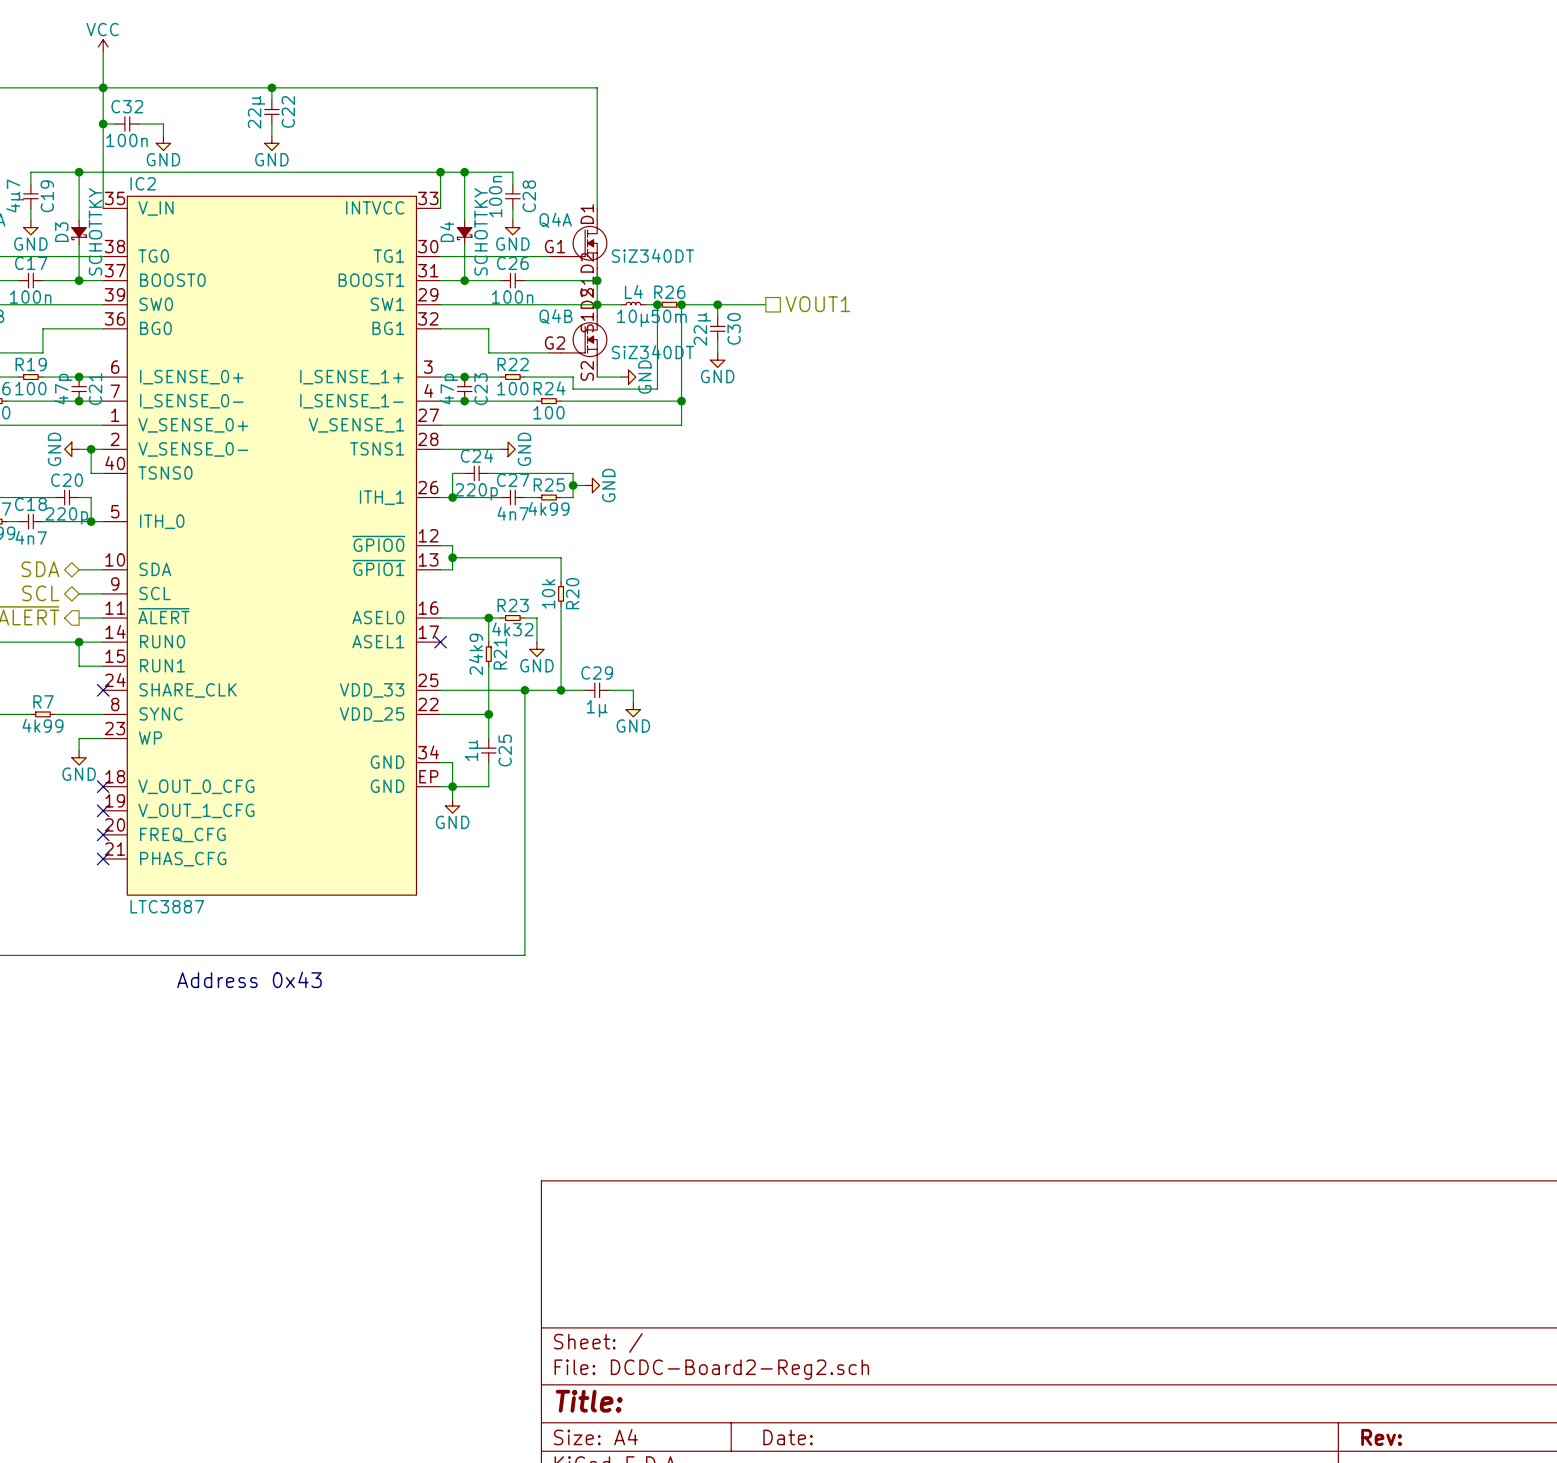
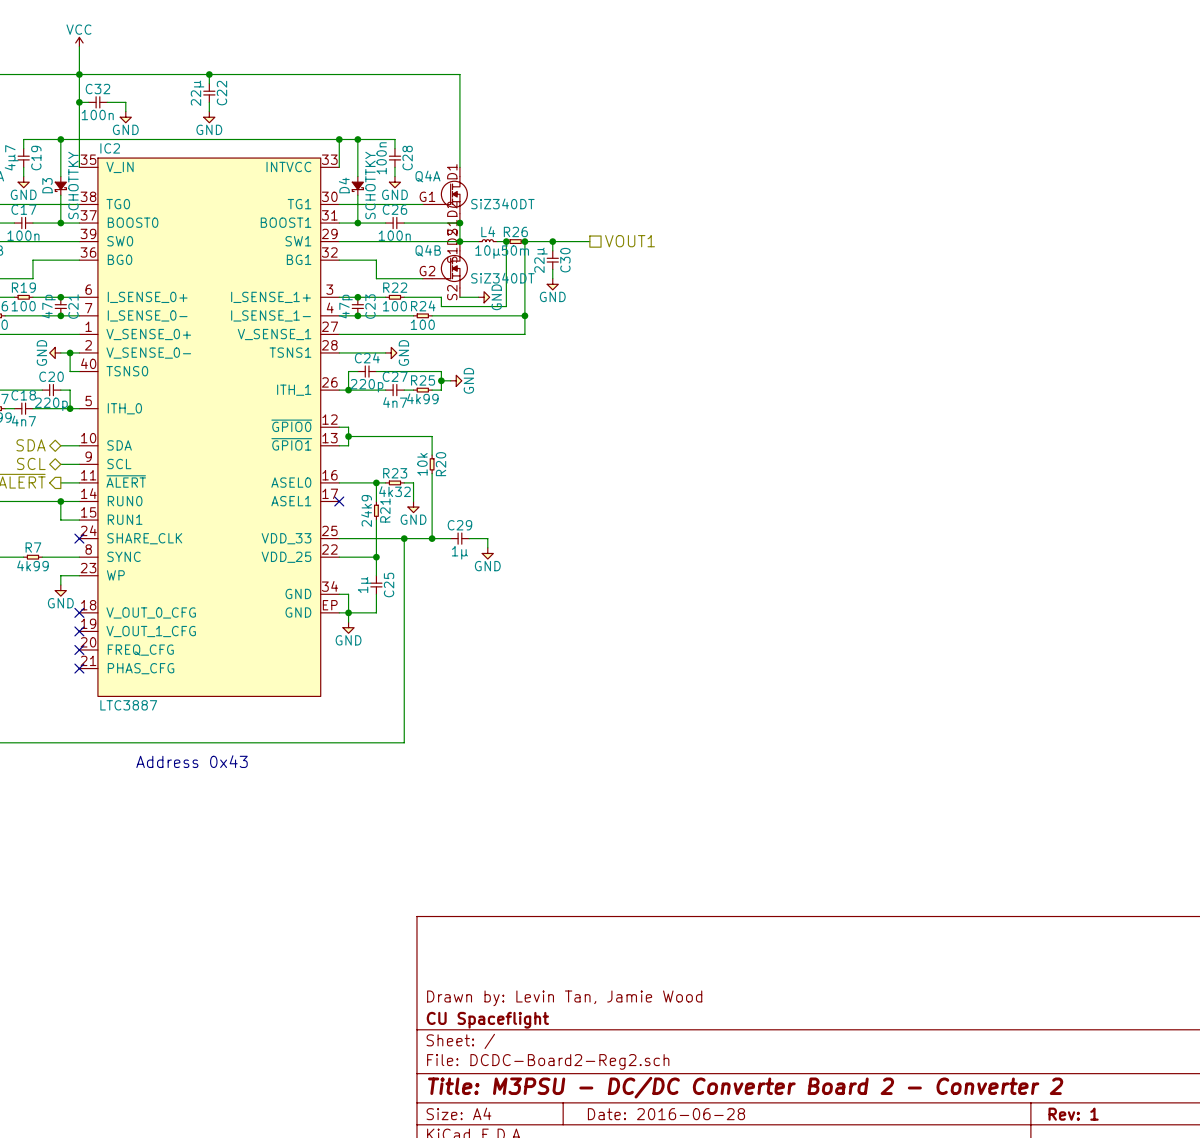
title block: none -> Drawn by: Levin Tan, Jamie Wood (564, 998)
title block: none -> CU Spaceflight (487, 1020)
title block: Title: (589, 1401) -> Title: M3PSU - DC/DC Converter Board 2 - Converter 2 (745, 1087)
title block: Date: (788, 1437) -> Date: 2016-06-28 (666, 1114)
title block: Rev: (1381, 1437) -> Rev: 1 (1073, 1114)

